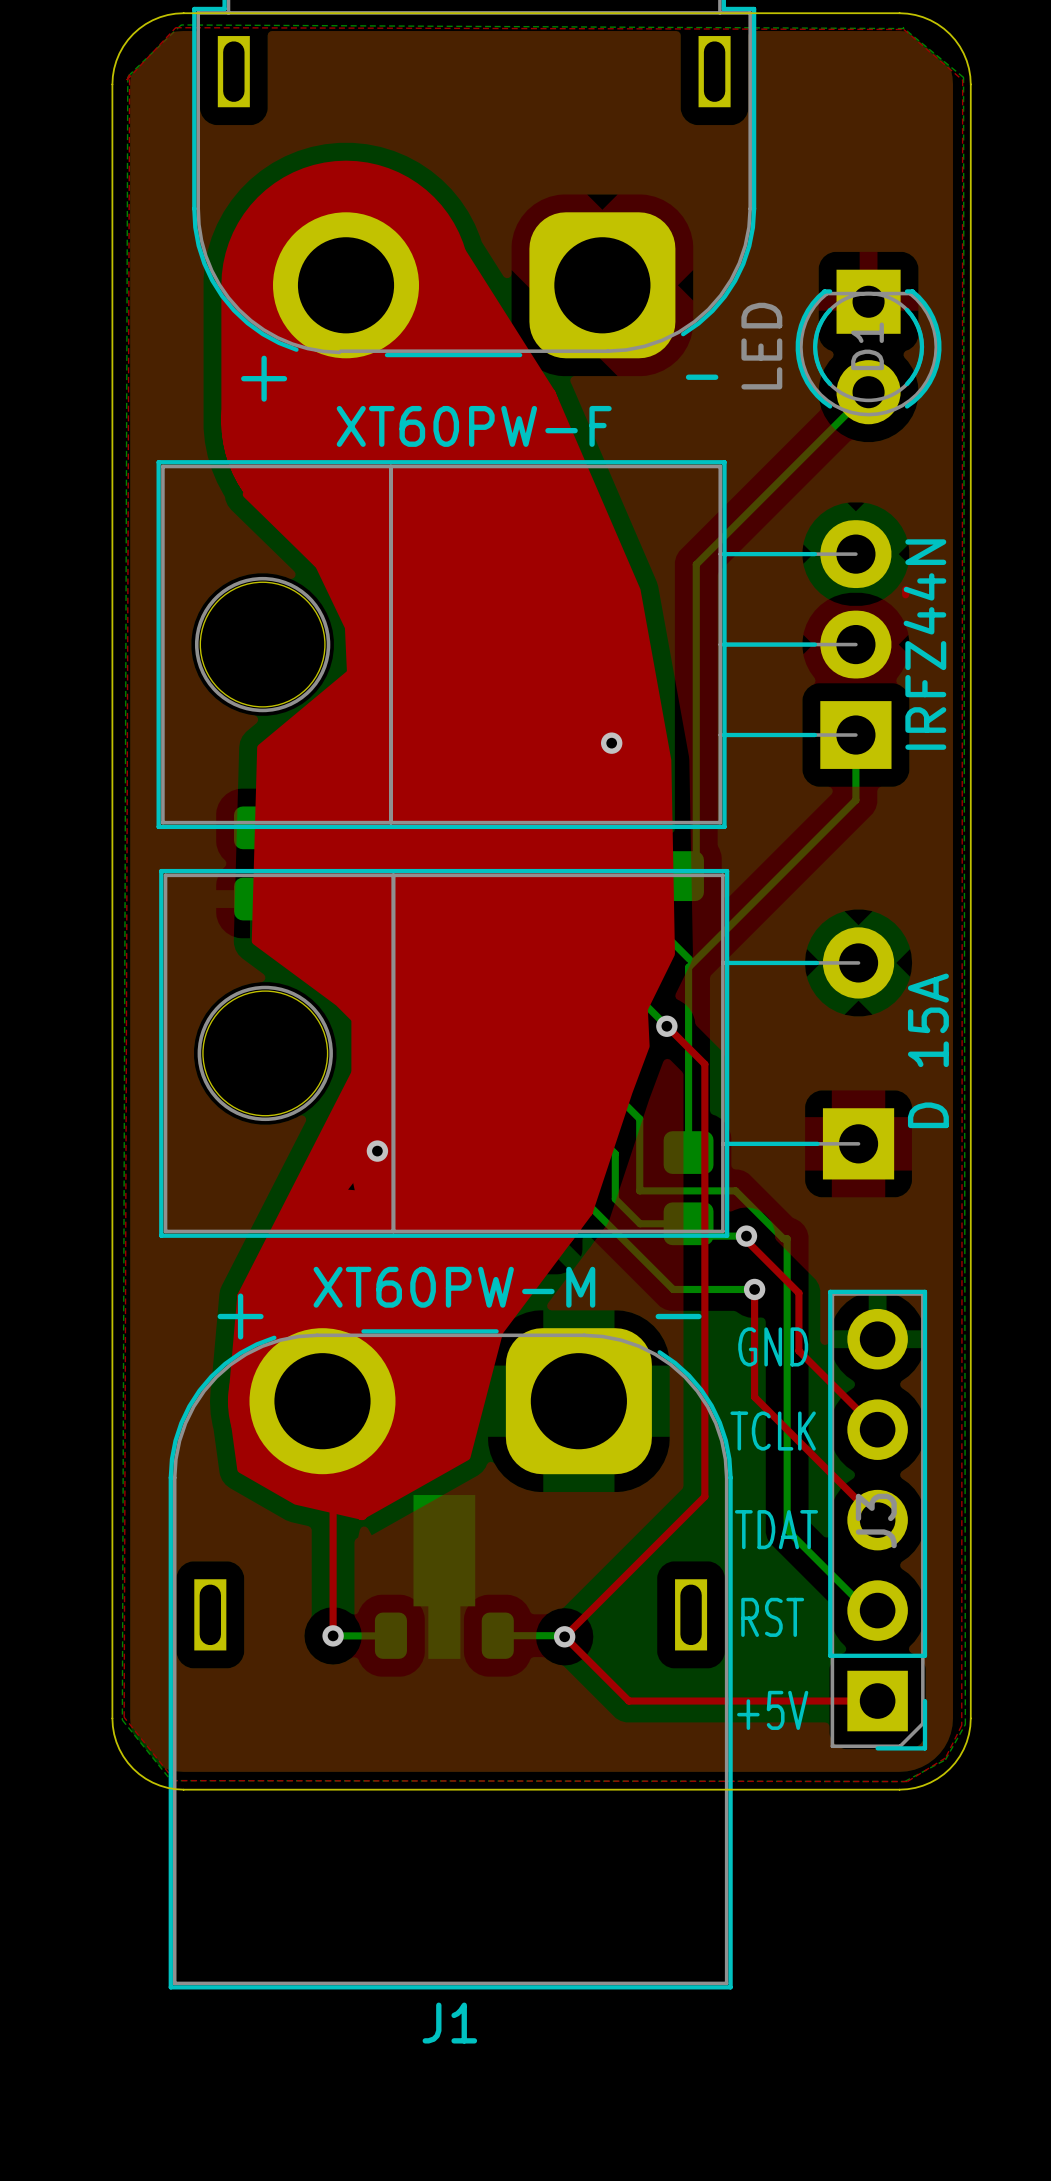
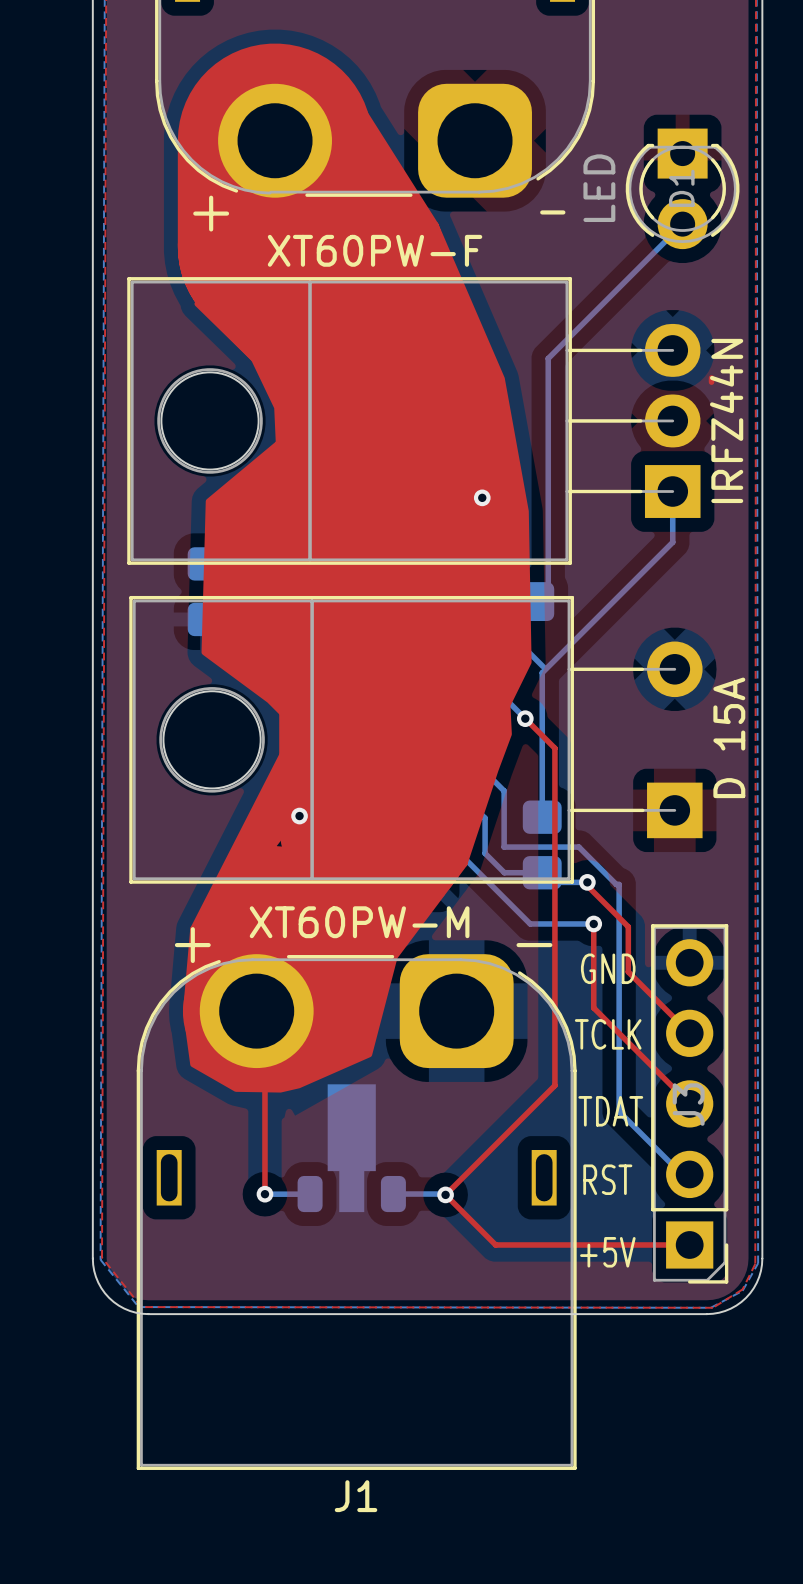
drawing shape: [227, 1189, 593, 1521] -> [182, 845, 468, 1093]

